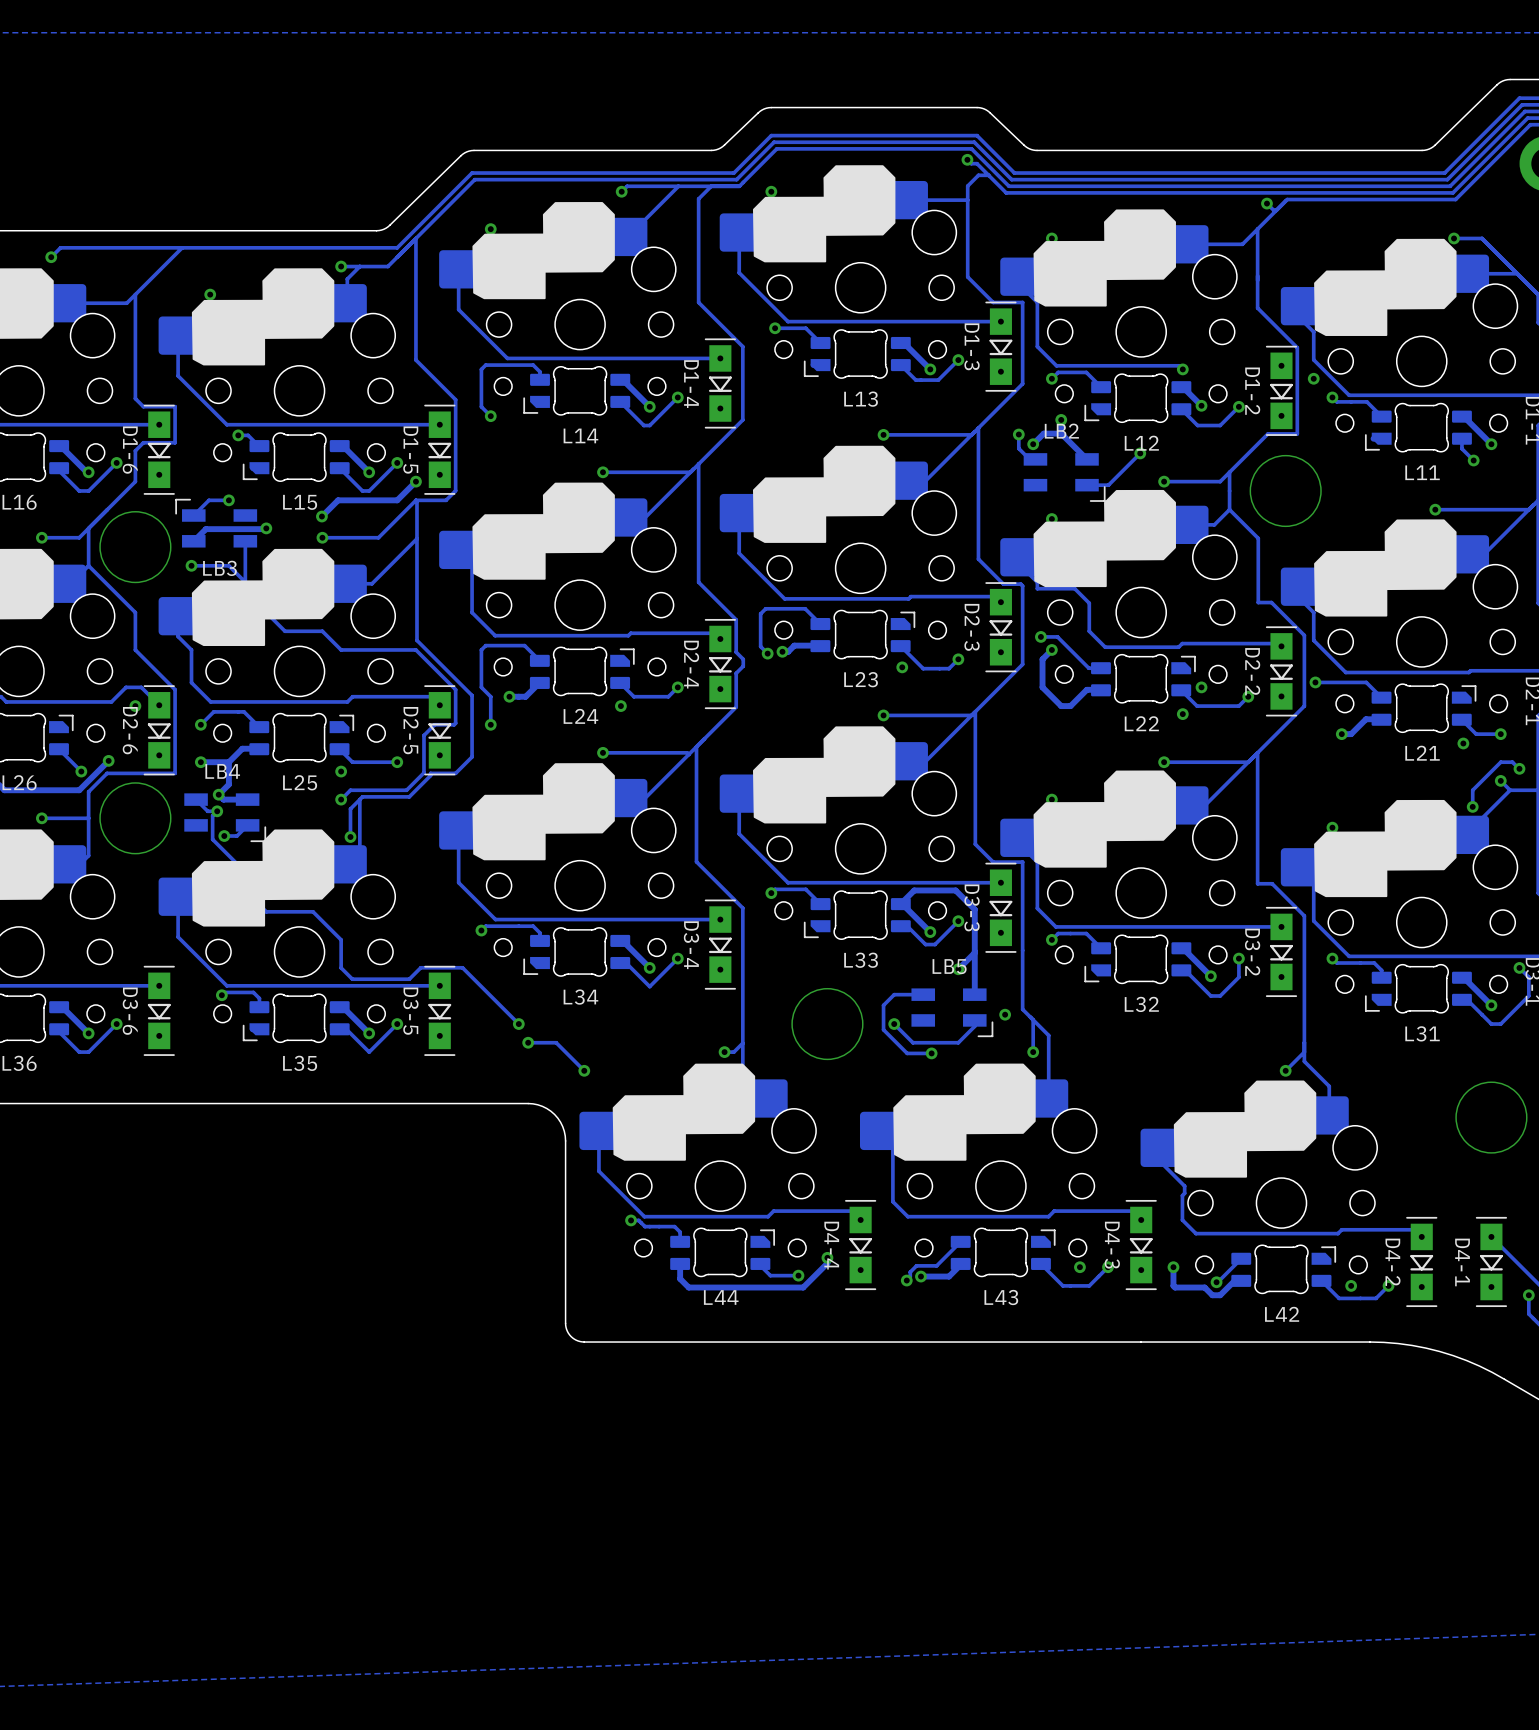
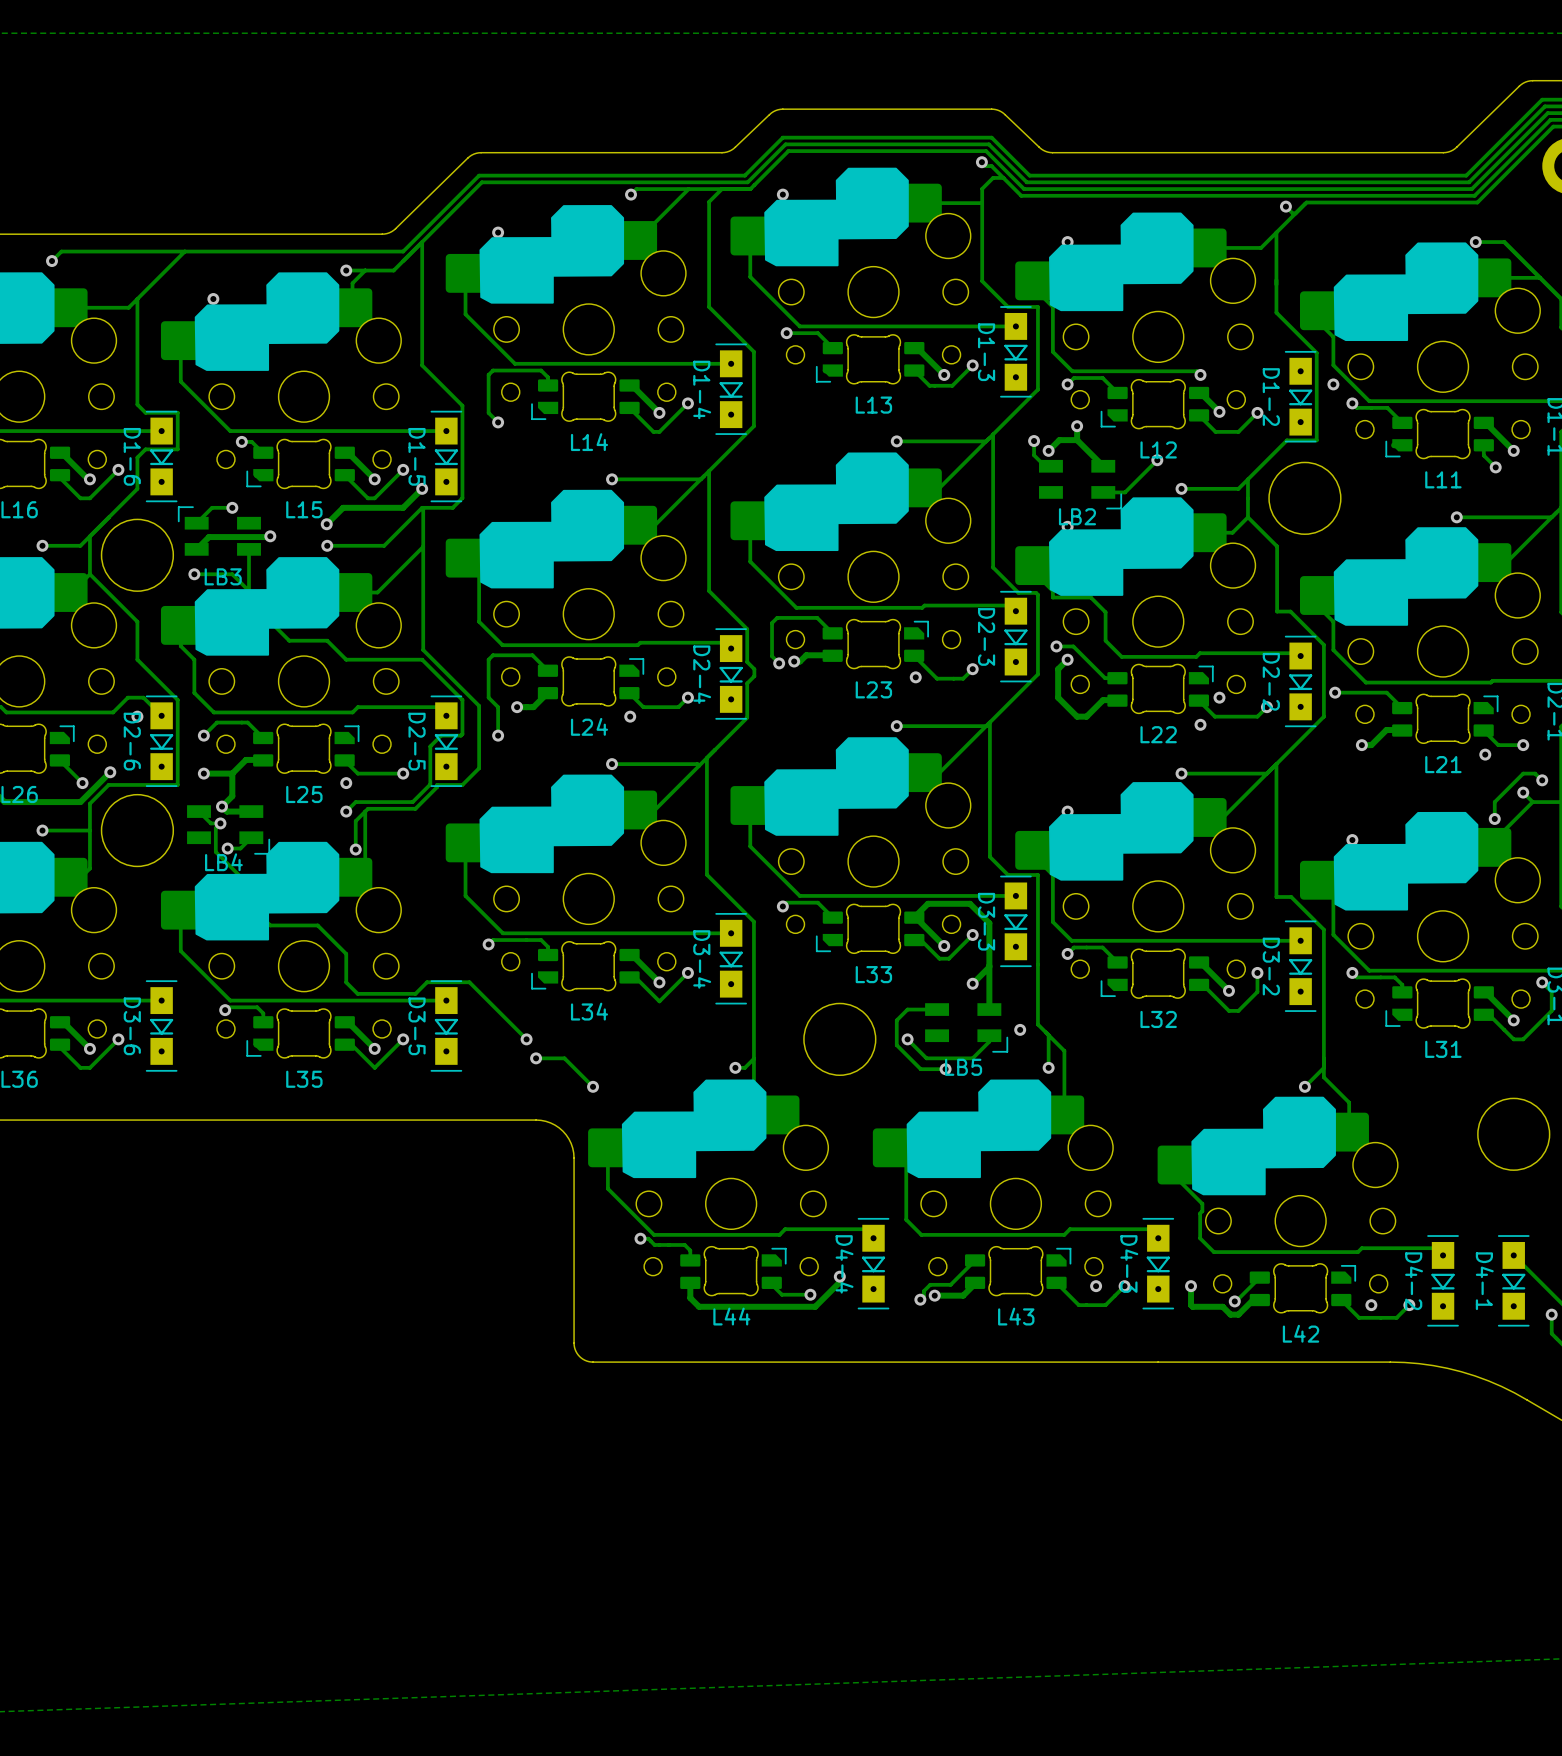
LB2 name position: LB2 (1061, 431) -> LB2 (1077, 516)
LB4 name position: LB4 (222, 771) -> LB4 (223, 862)
LB5 name position: LB5 (949, 966) -> LB5 (963, 1067)

